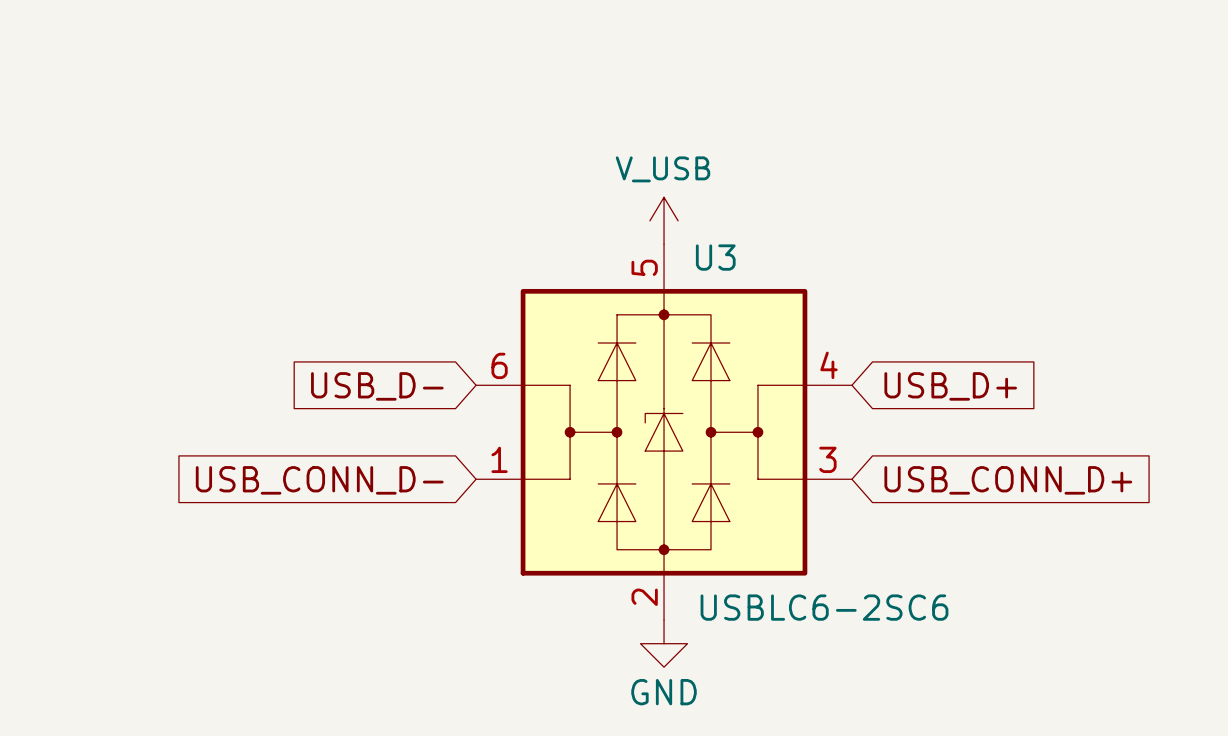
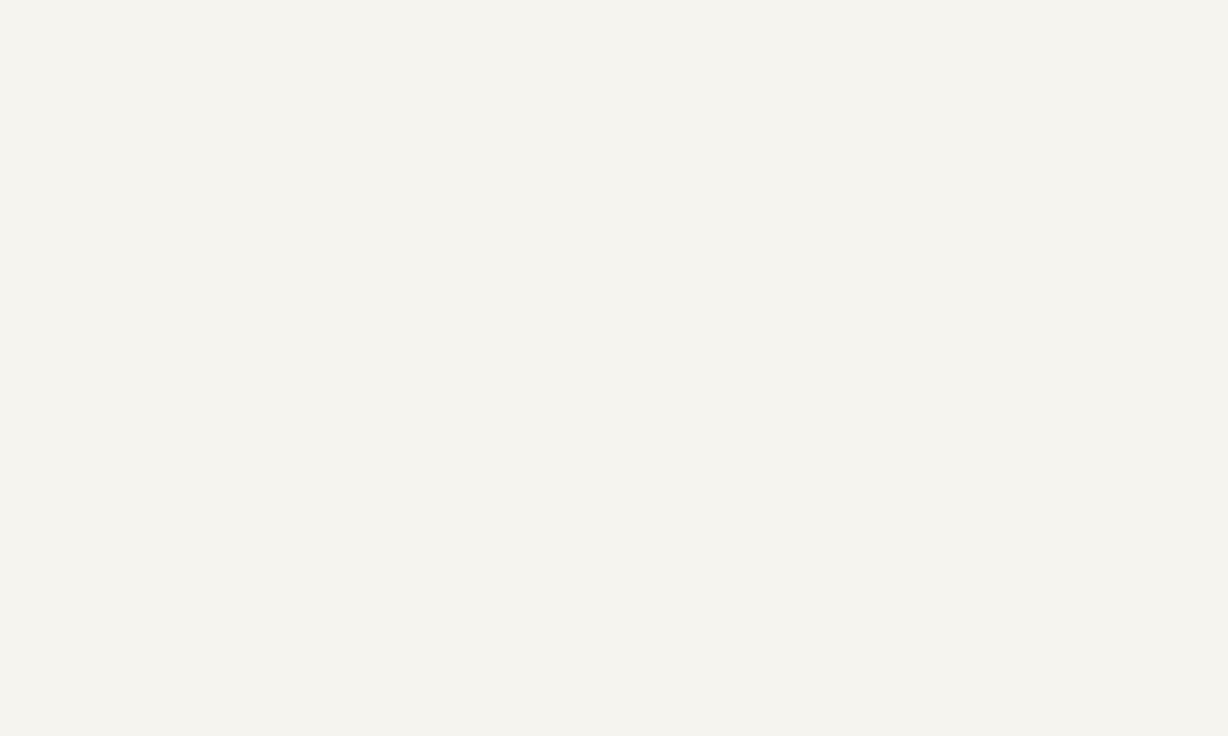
power symbol: V_USB (664, 220) -> none
global label: USB_D- (377, 386) -> none
global label: USB_D+ (950, 386) -> none
U3: USBLC6-2SC6 (664, 432) -> none
global label: USB_CONN_D- (319, 480) -> none
global label: USB_CONN_D+ (1008, 480) -> none
power symbol: GND (664, 643) -> none

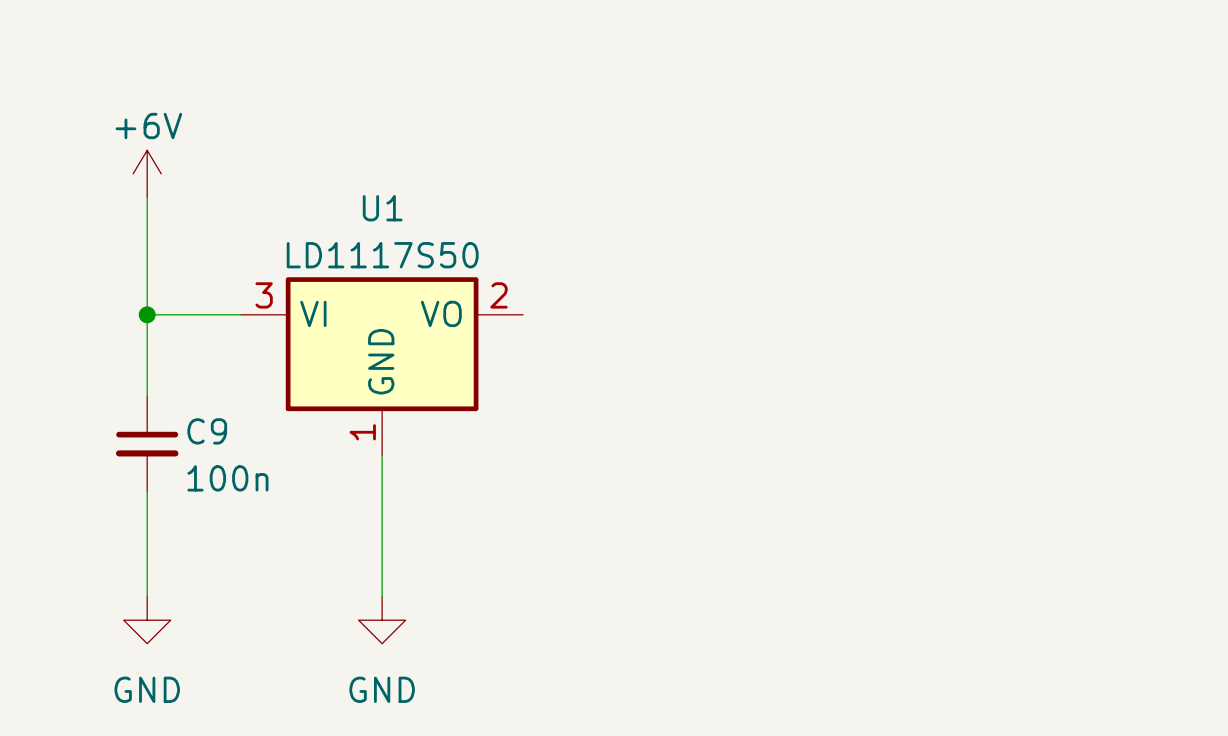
power symbol: none -> +6V (147, 173)
wire: none -> (147, 197) (147, 397)
wire: none -> (147, 314) (241, 314)
junction: none -> (147, 314)
U1: none -> LD1117S50 (382, 366)
C9: none -> 100n (147, 444)
wire: none -> (382, 455) (382, 596)
wire: none -> (147, 491) (147, 596)
power symbol: none -> GND (147, 620)
power symbol: none -> GND (382, 620)

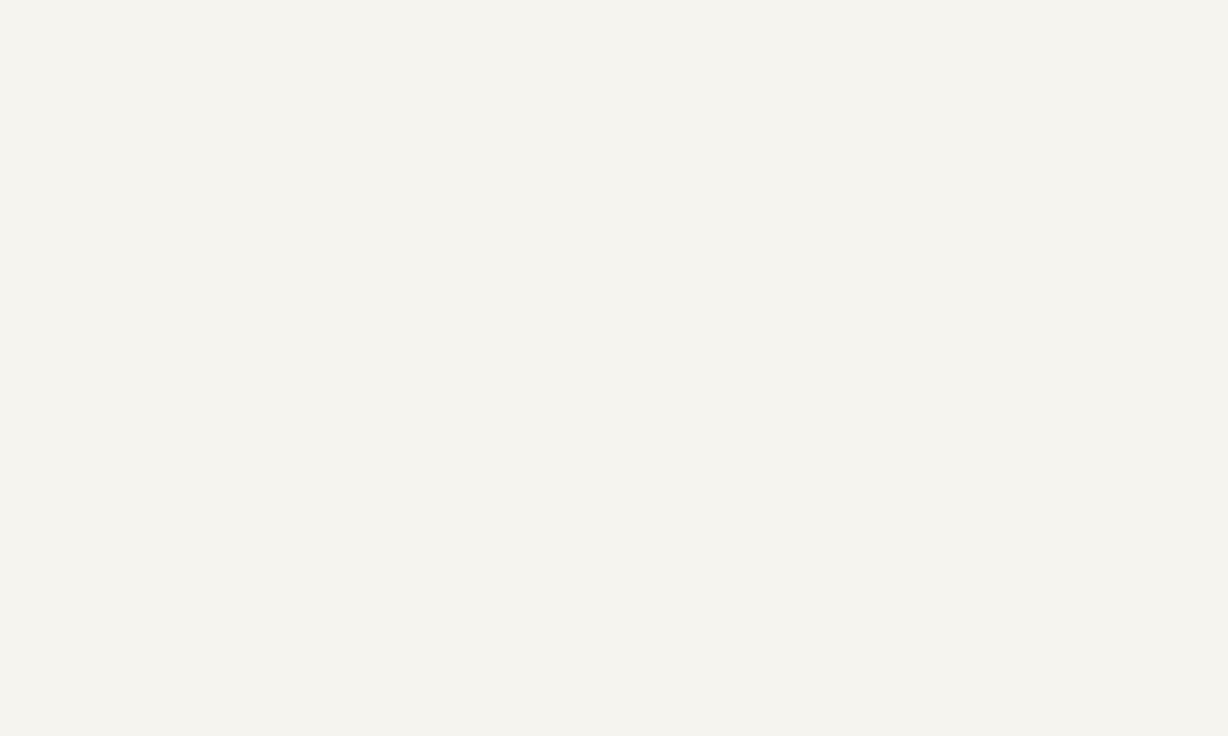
power symbol: +6V (147, 173) -> none
wire: (147, 197) (147, 397) -> none
wire: (147, 314) (241, 314) -> none
junction: (147, 314) -> none
U1: LD1117S50 (382, 366) -> none
C9: 100n (147, 444) -> none
wire: (382, 455) (382, 596) -> none
wire: (147, 491) (147, 596) -> none
power symbol: GND (147, 620) -> none
power symbol: GND (382, 620) -> none

